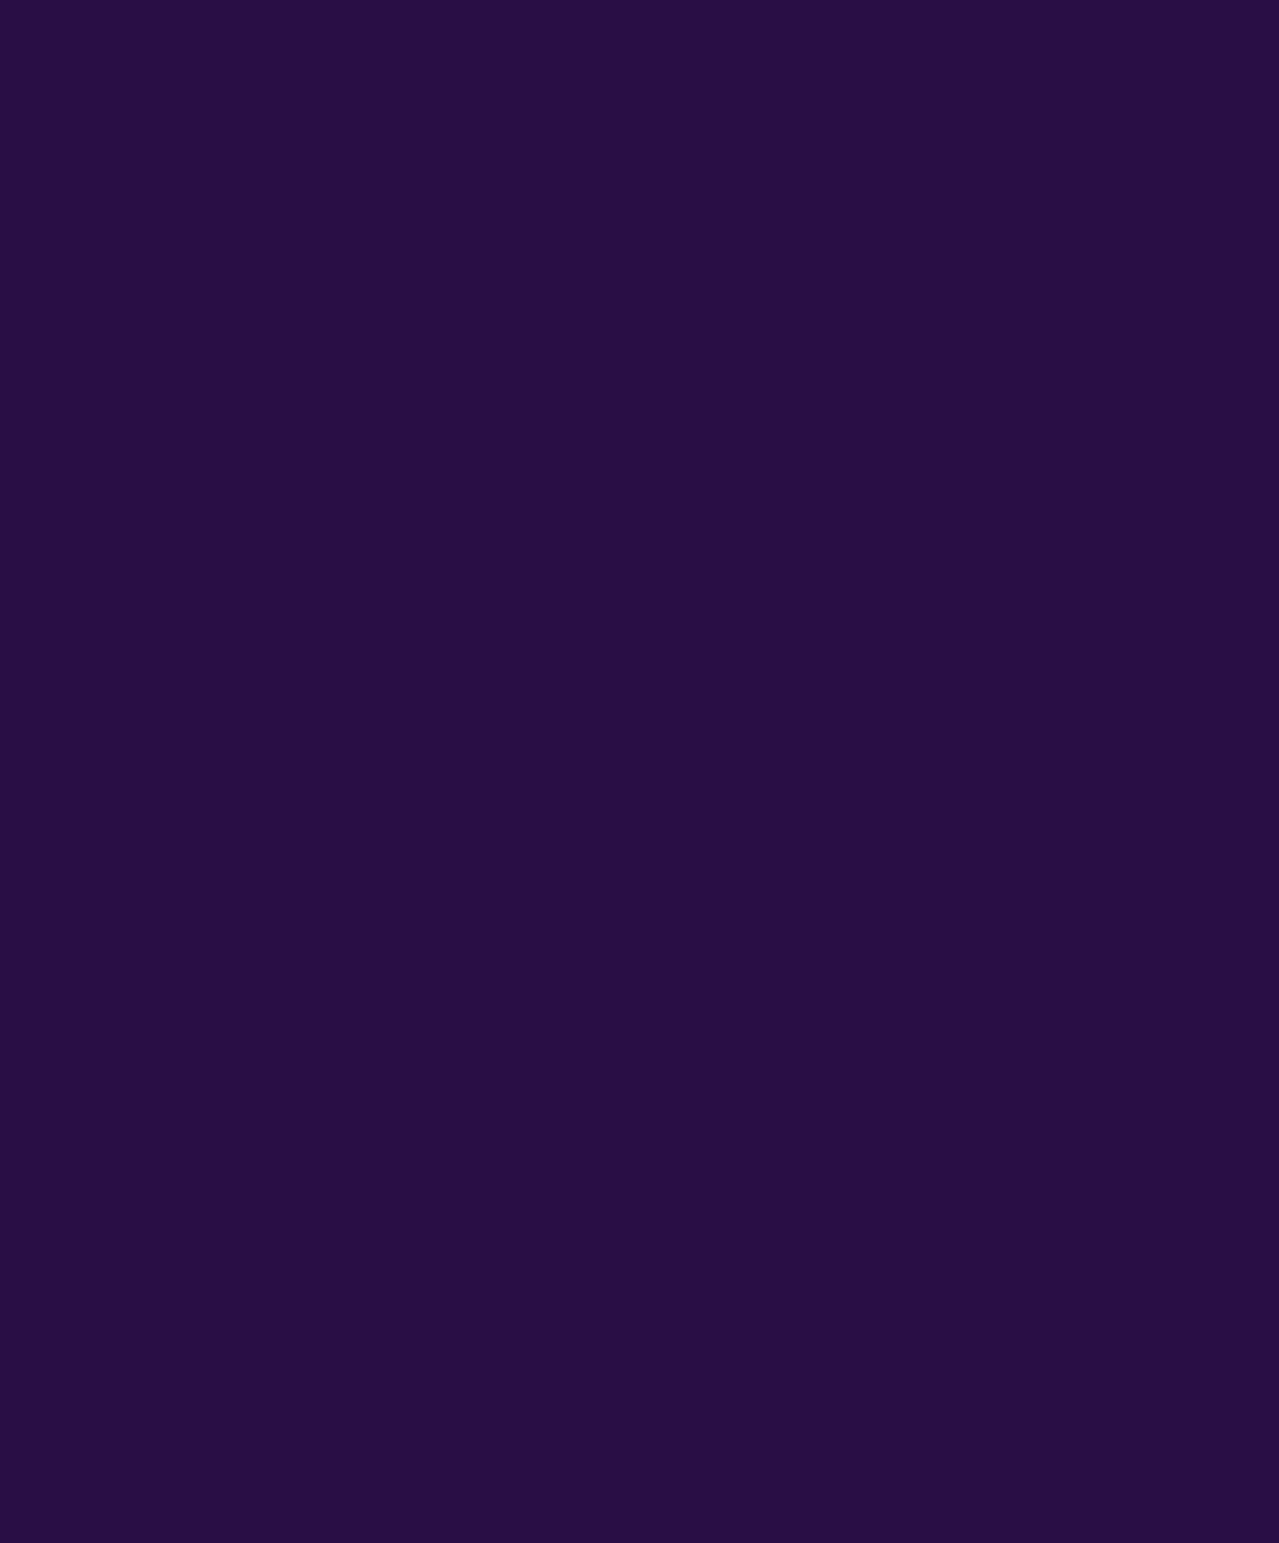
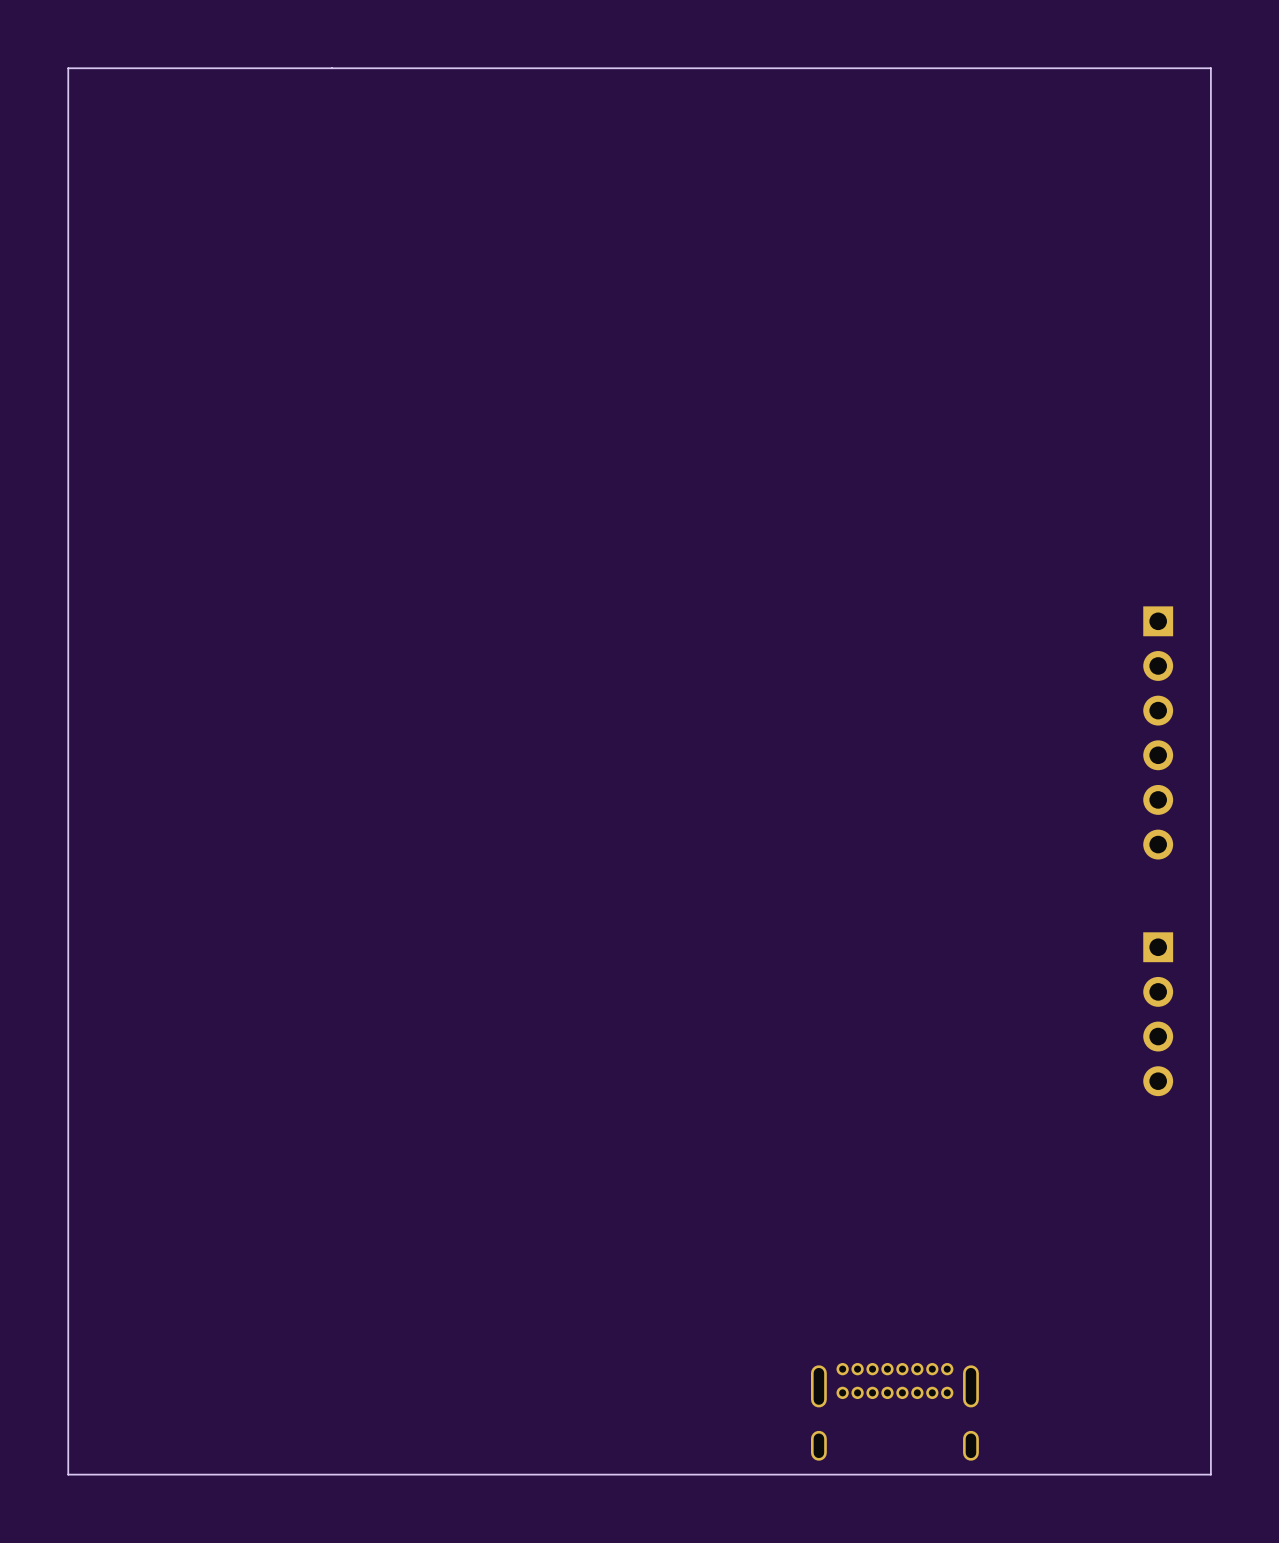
board edge: none -> (1210, 68) (68, 68) (68, 1474) (1210, 1474) (1210, 68)
part: none -> (1158, 732)
part: none -> (1158, 1014)
part: none -> (894, 1411)

